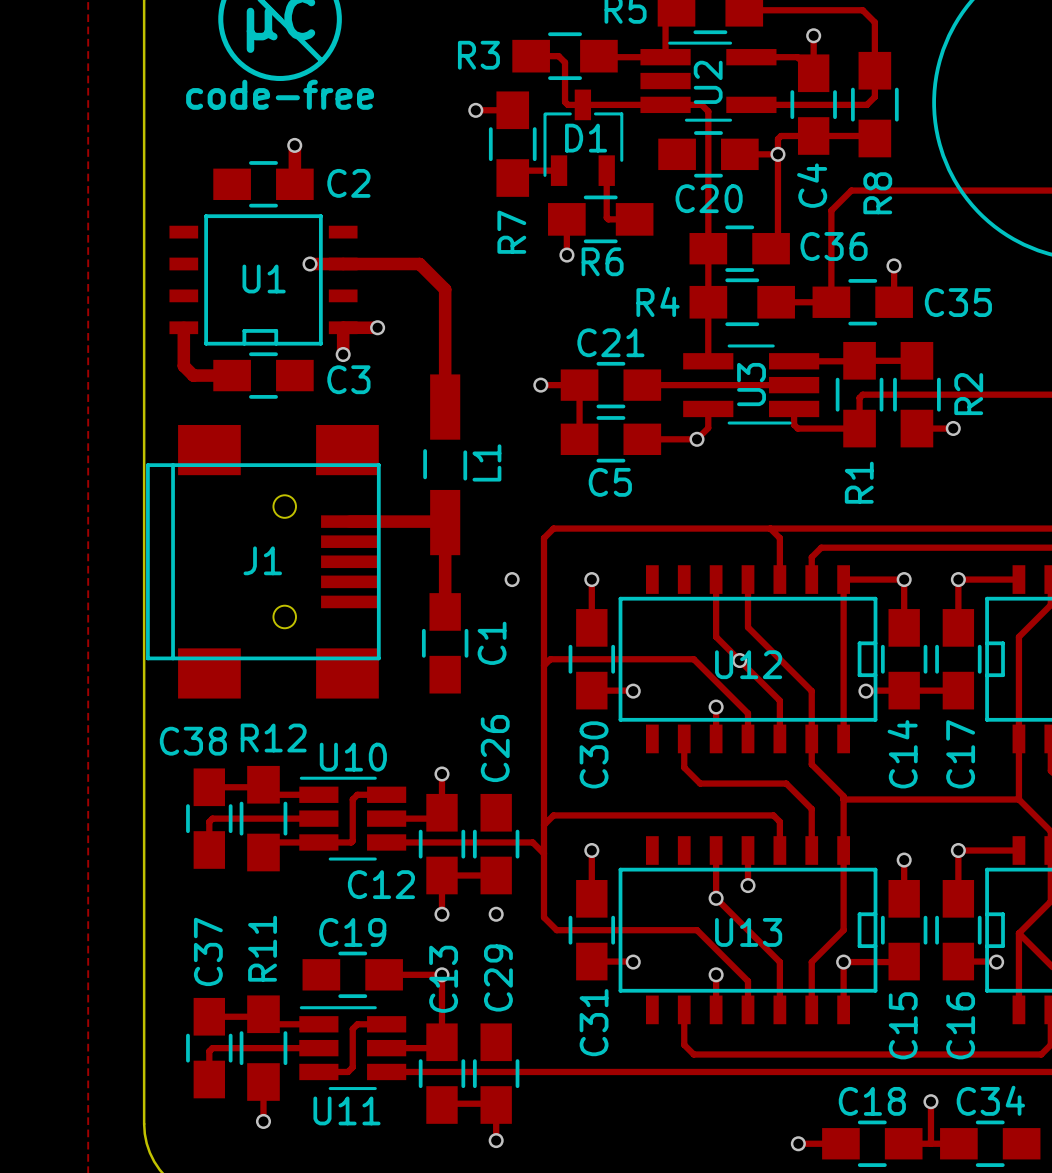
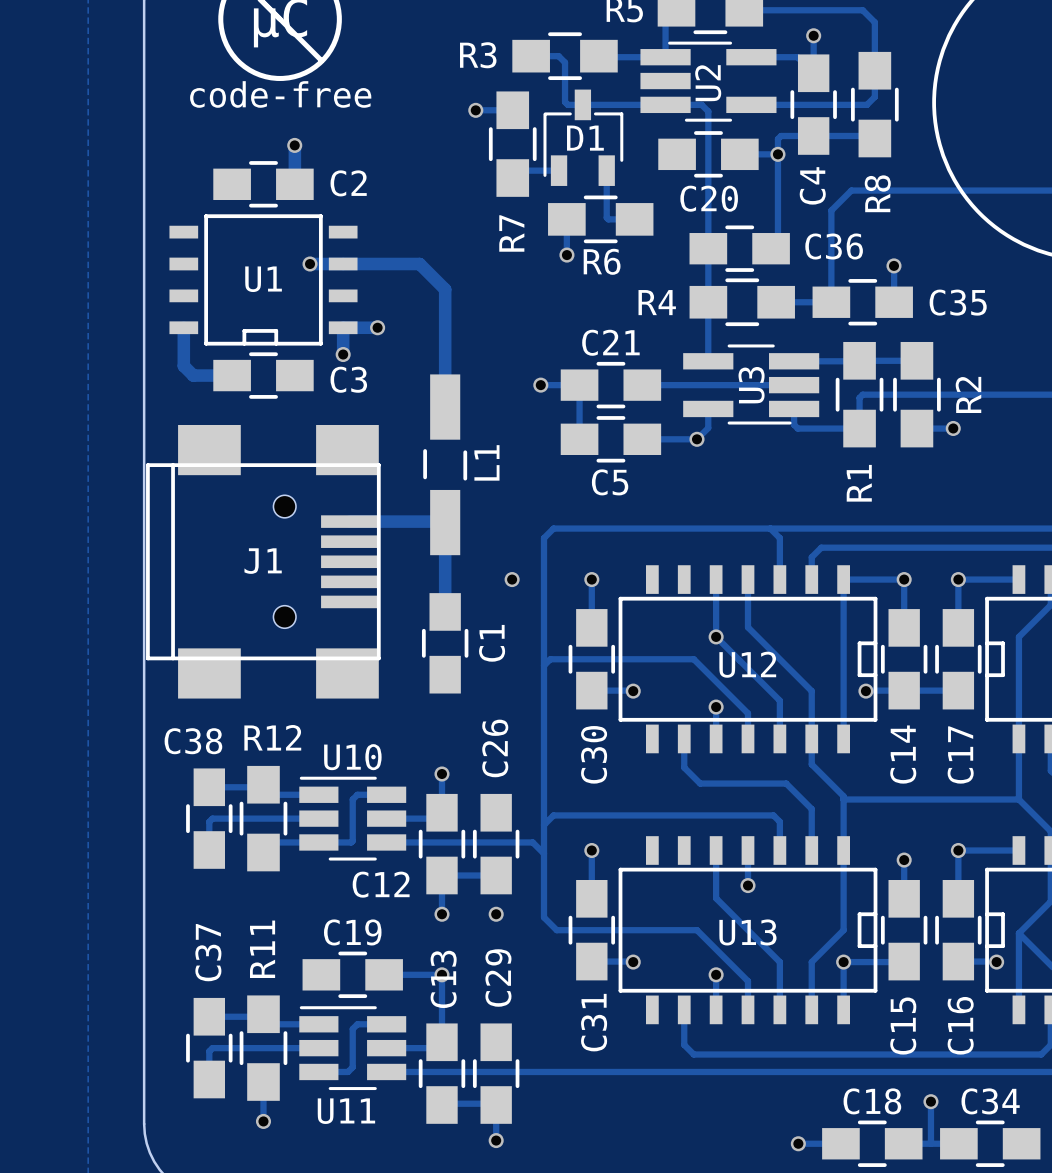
via position: (739, 660) -> (716, 636)
via: (716, 898) -> none

